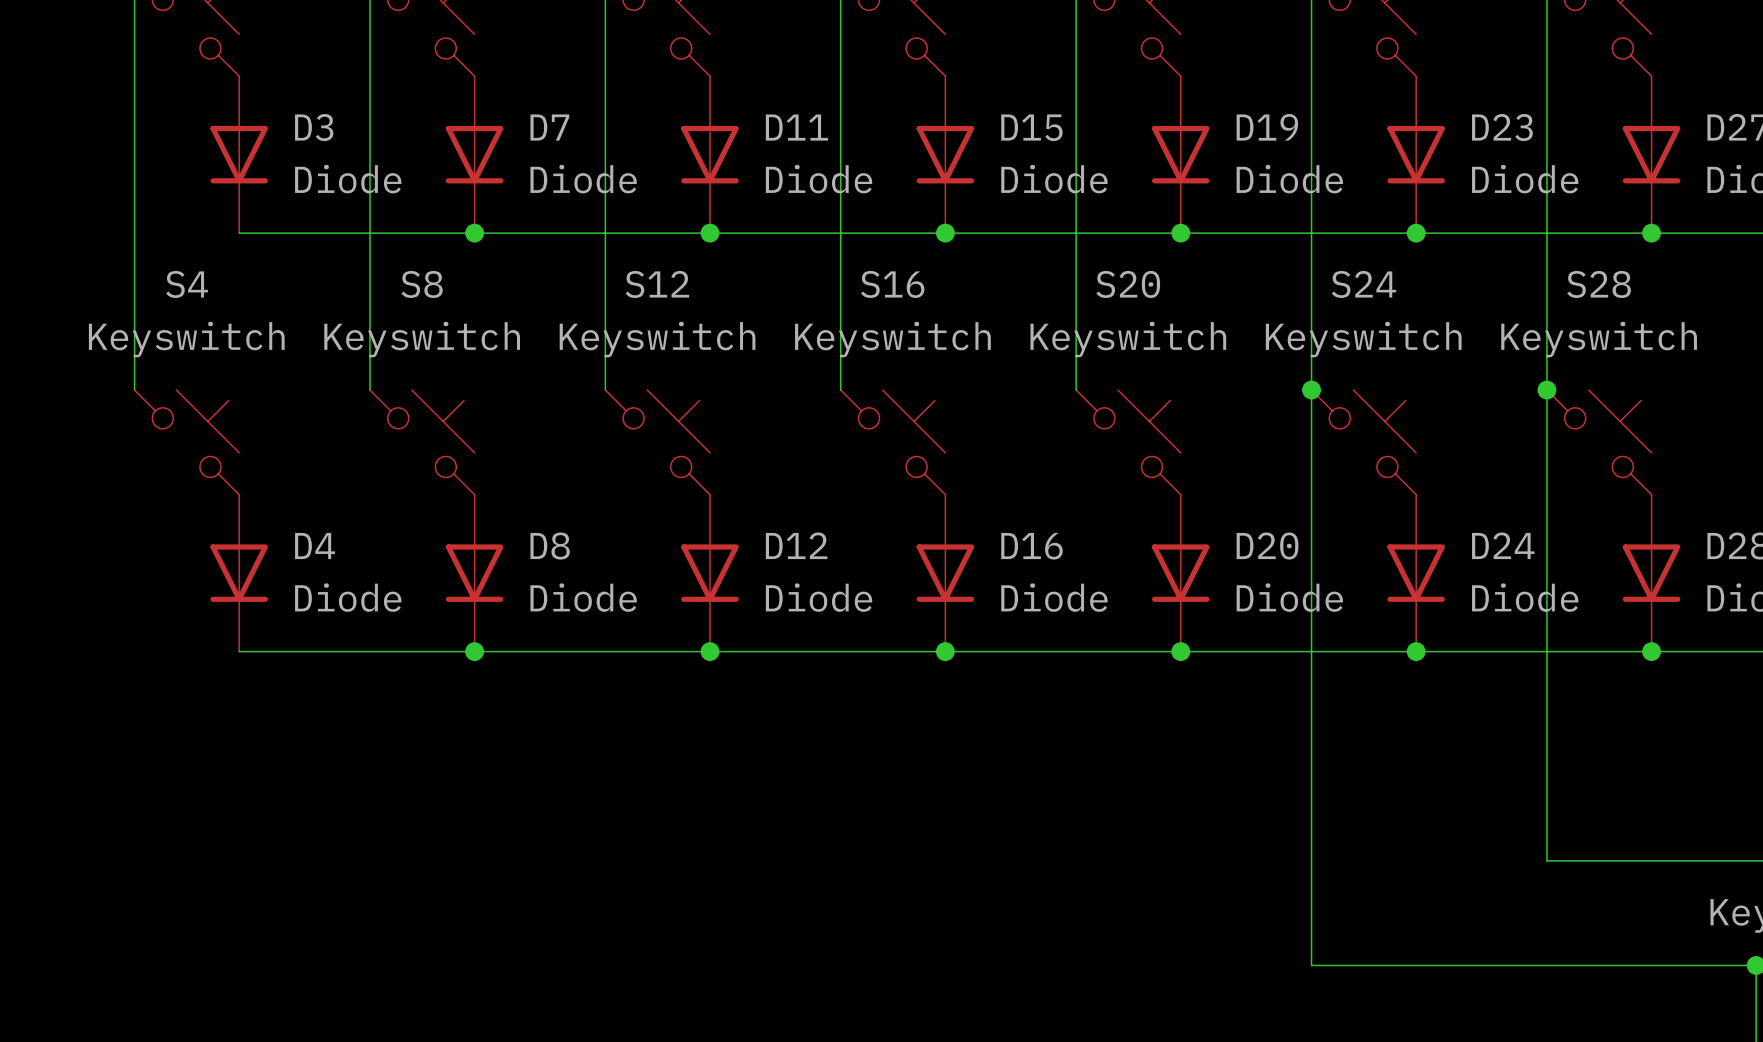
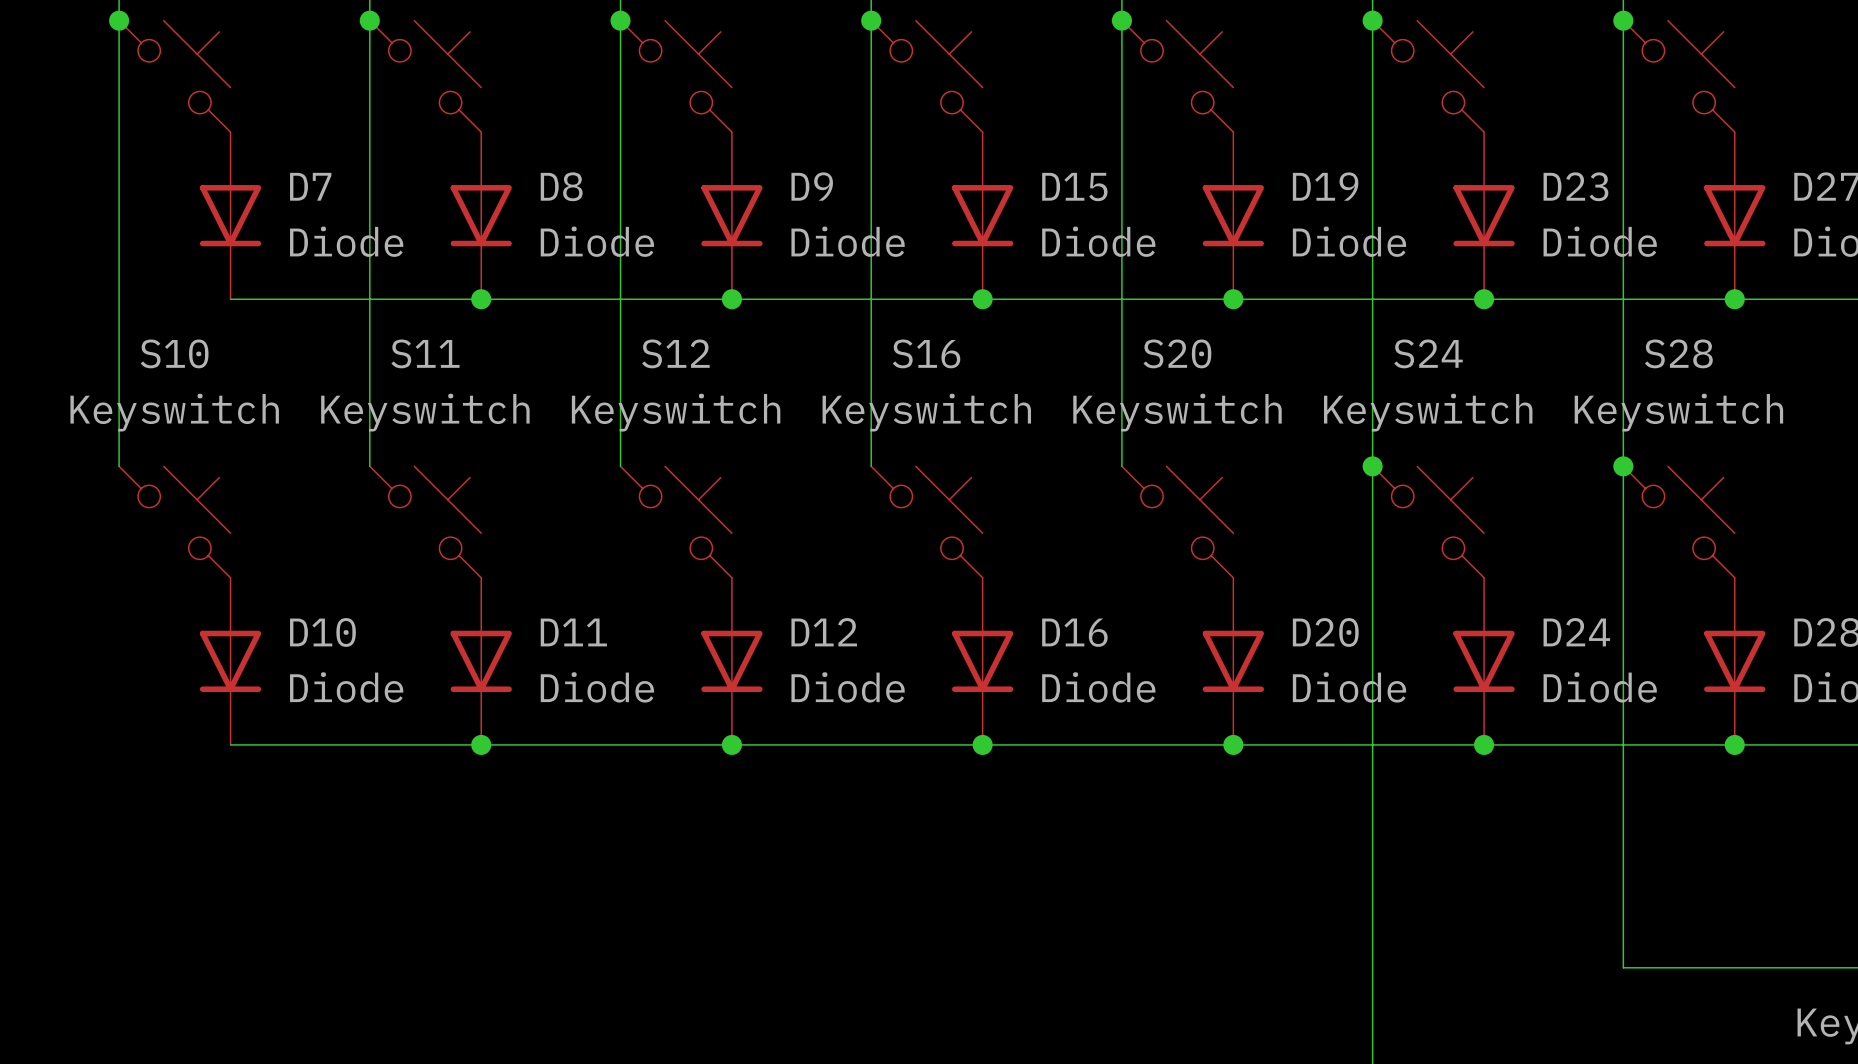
D3 name: D3 (314, 127) -> D7 (310, 186)
D7 name: D7 (549, 127) -> D8 (561, 186)
D11 name: D11 (796, 127) -> D9 (812, 186)
S4 name: S4 (187, 284) -> S10 (174, 353)
S8 name: S8 (422, 284) -> S11 (425, 353)
D4 name: D4 (315, 546) -> D10 (322, 632)
D8 name: D8 (550, 546) -> D11 (573, 632)

